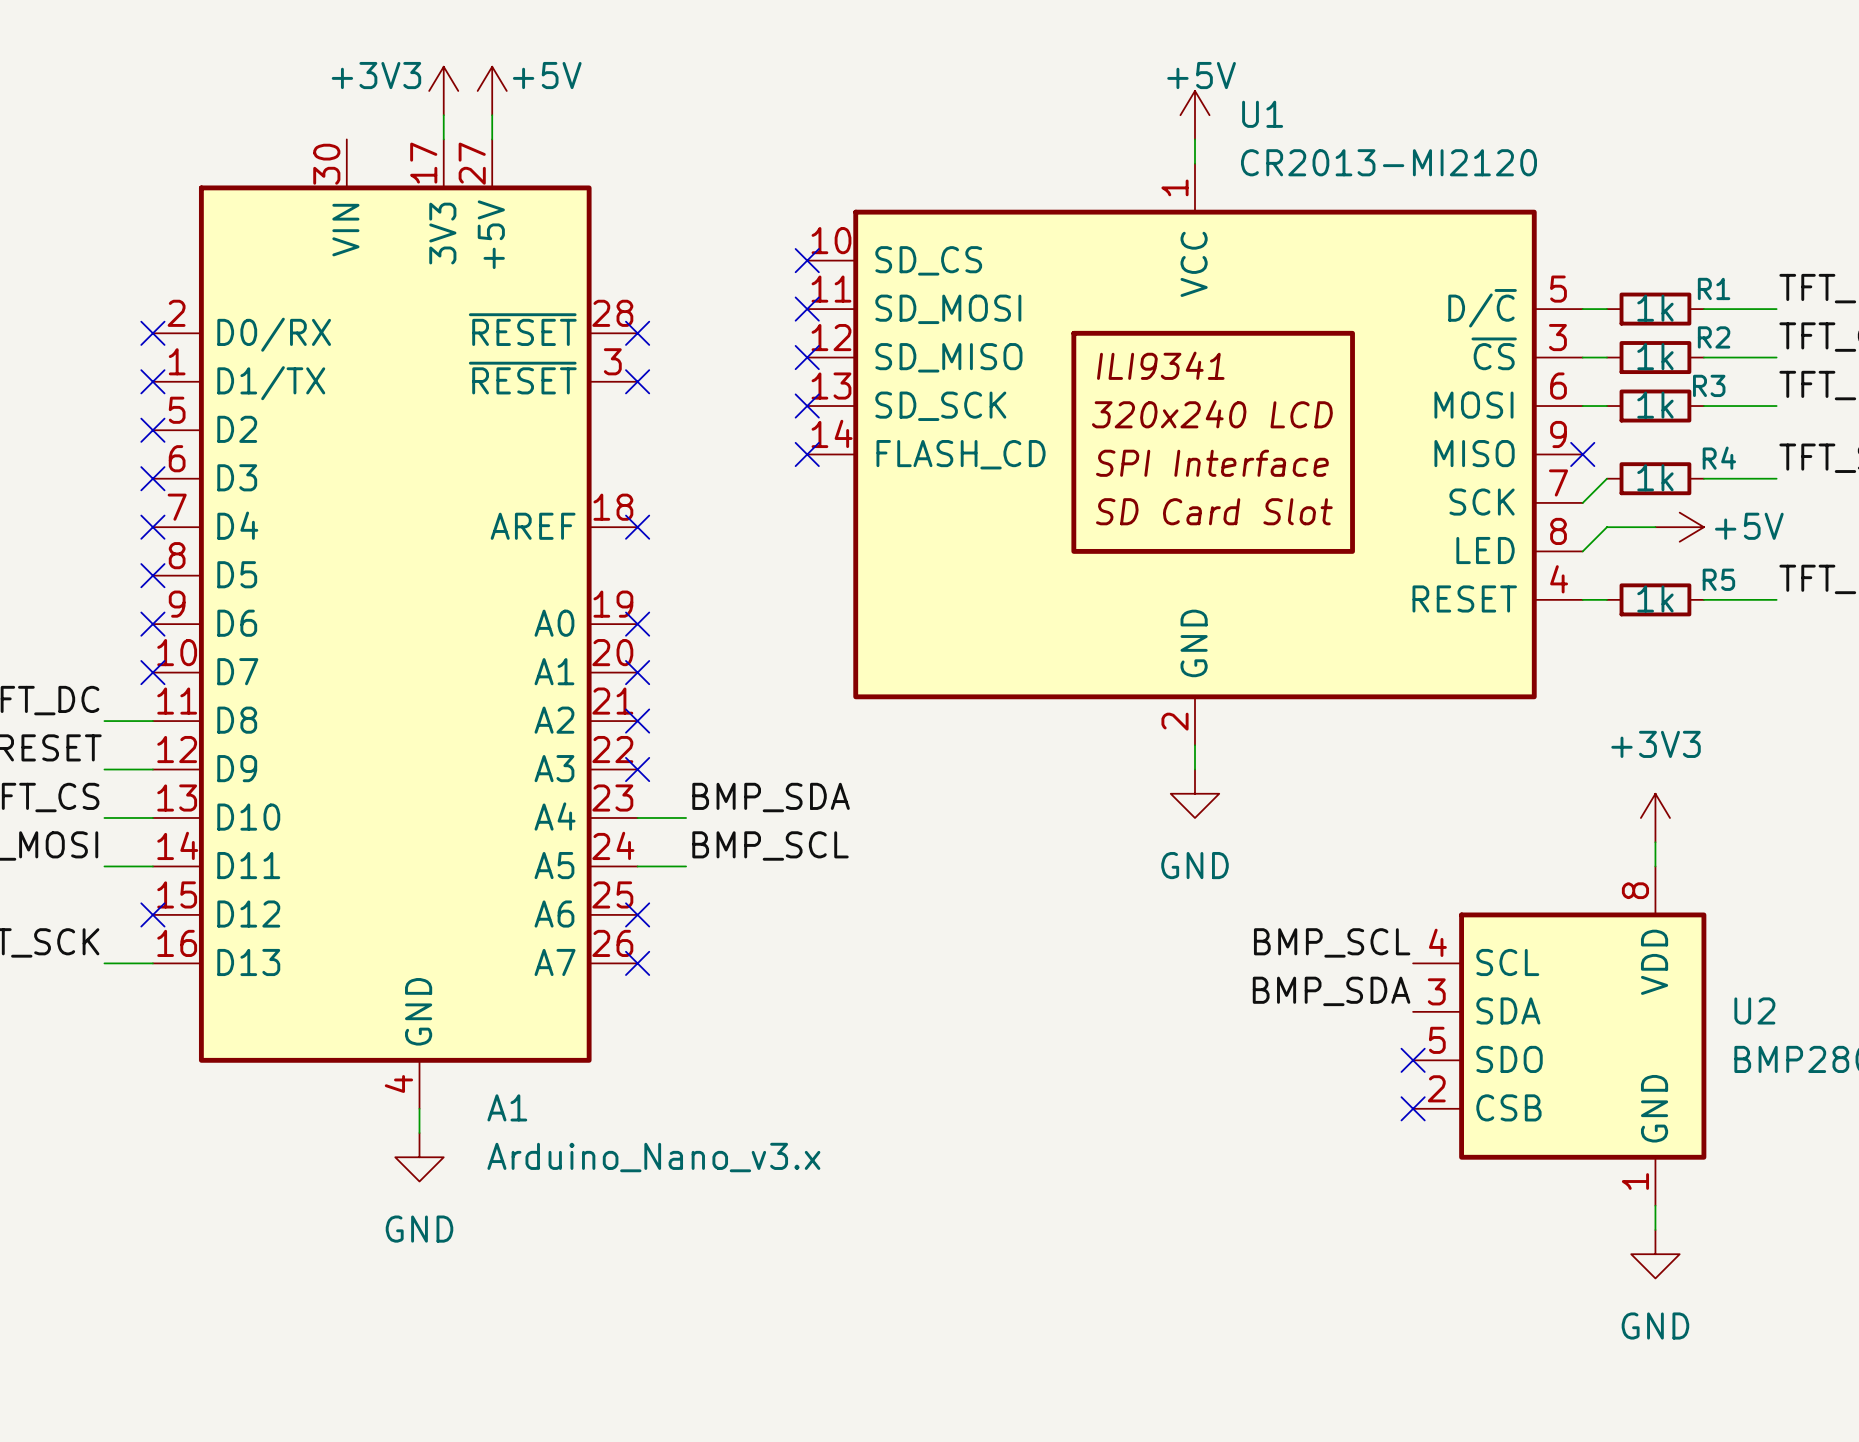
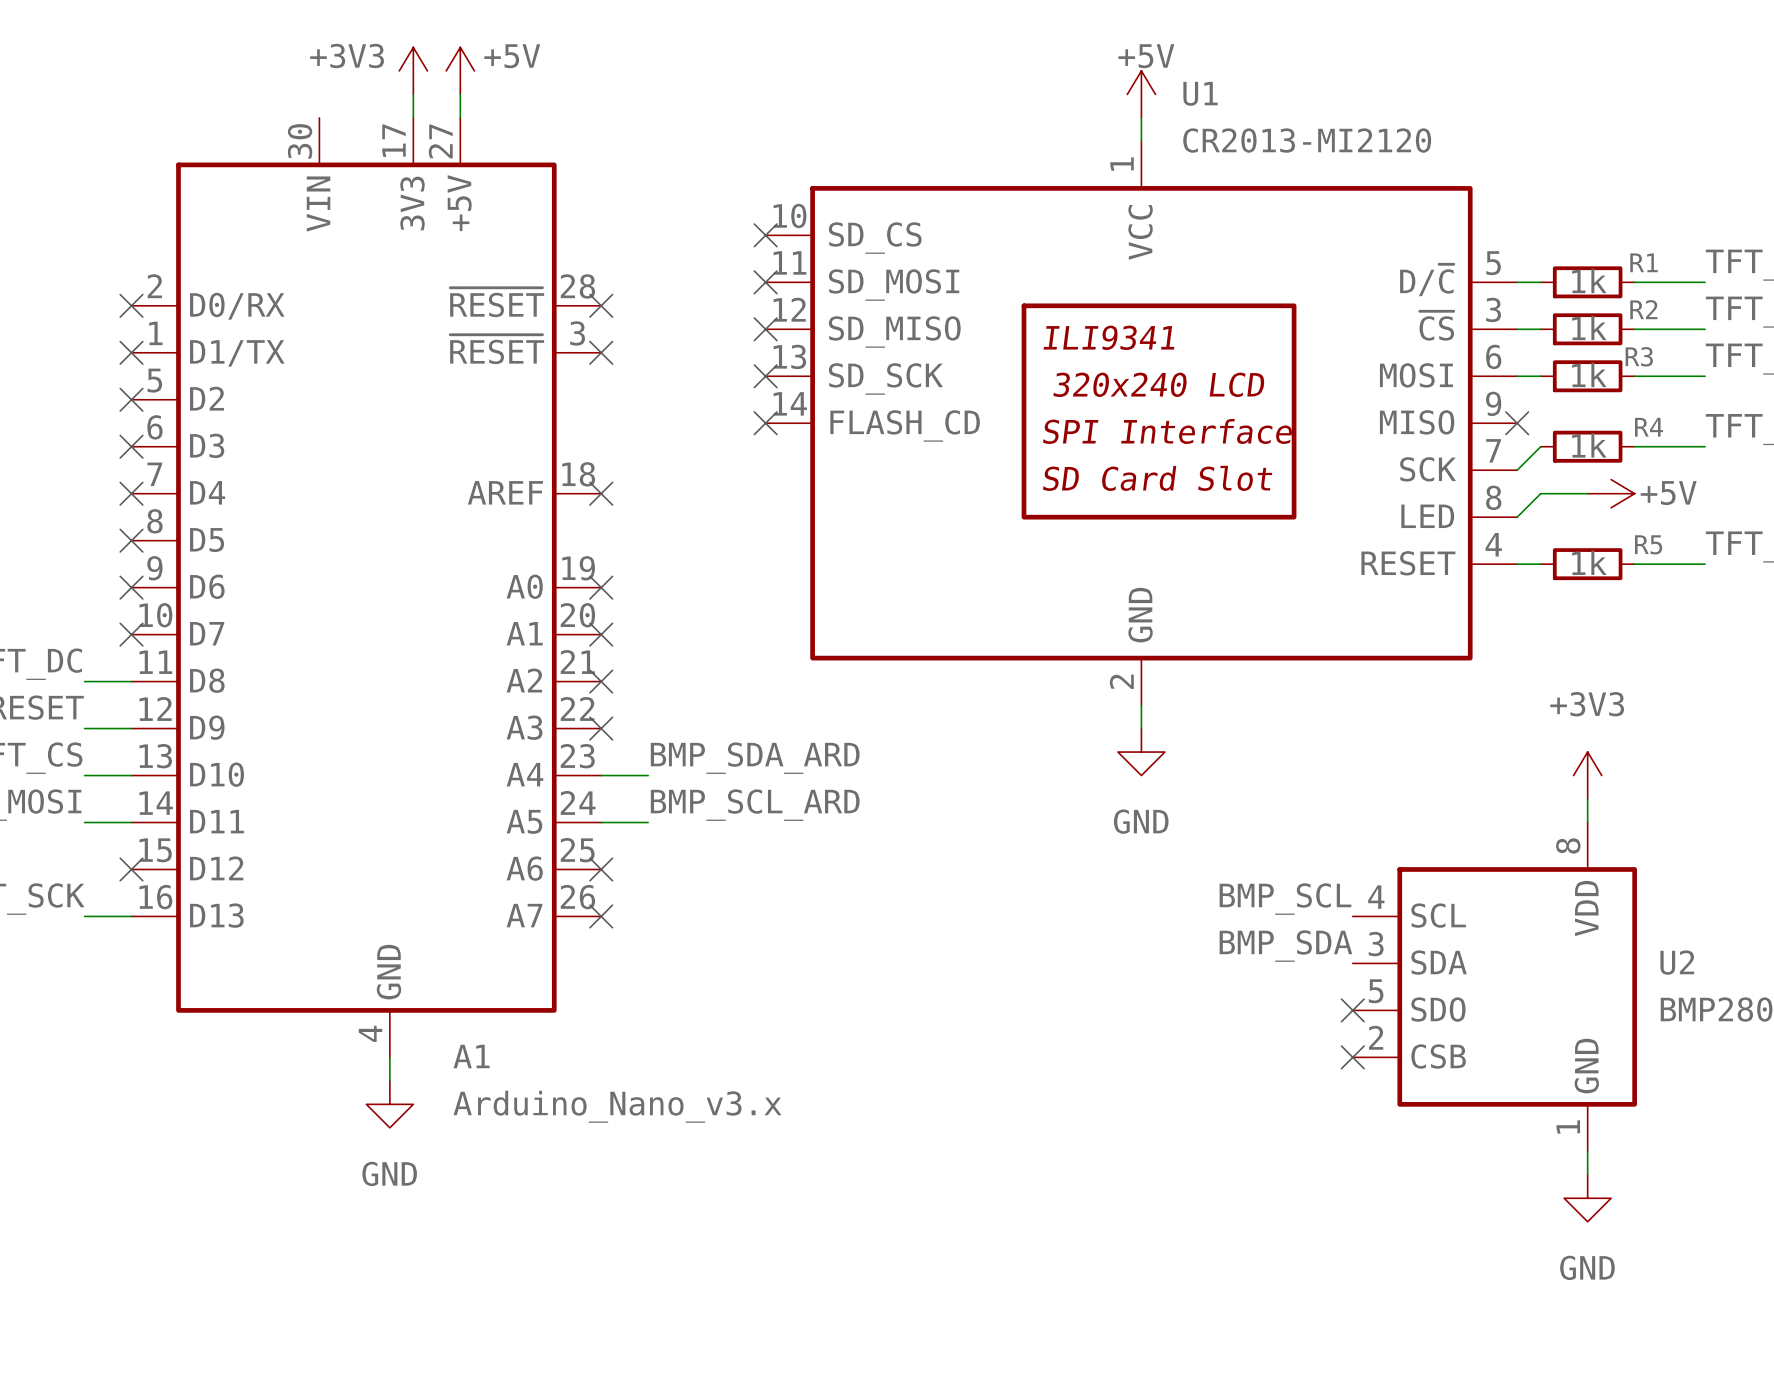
label: BMP_SDA (771, 797) -> BMP_SDA_ARD (755, 758)
label: BMP_SCL (770, 845) -> BMP_SCL_ARD (755, 805)

